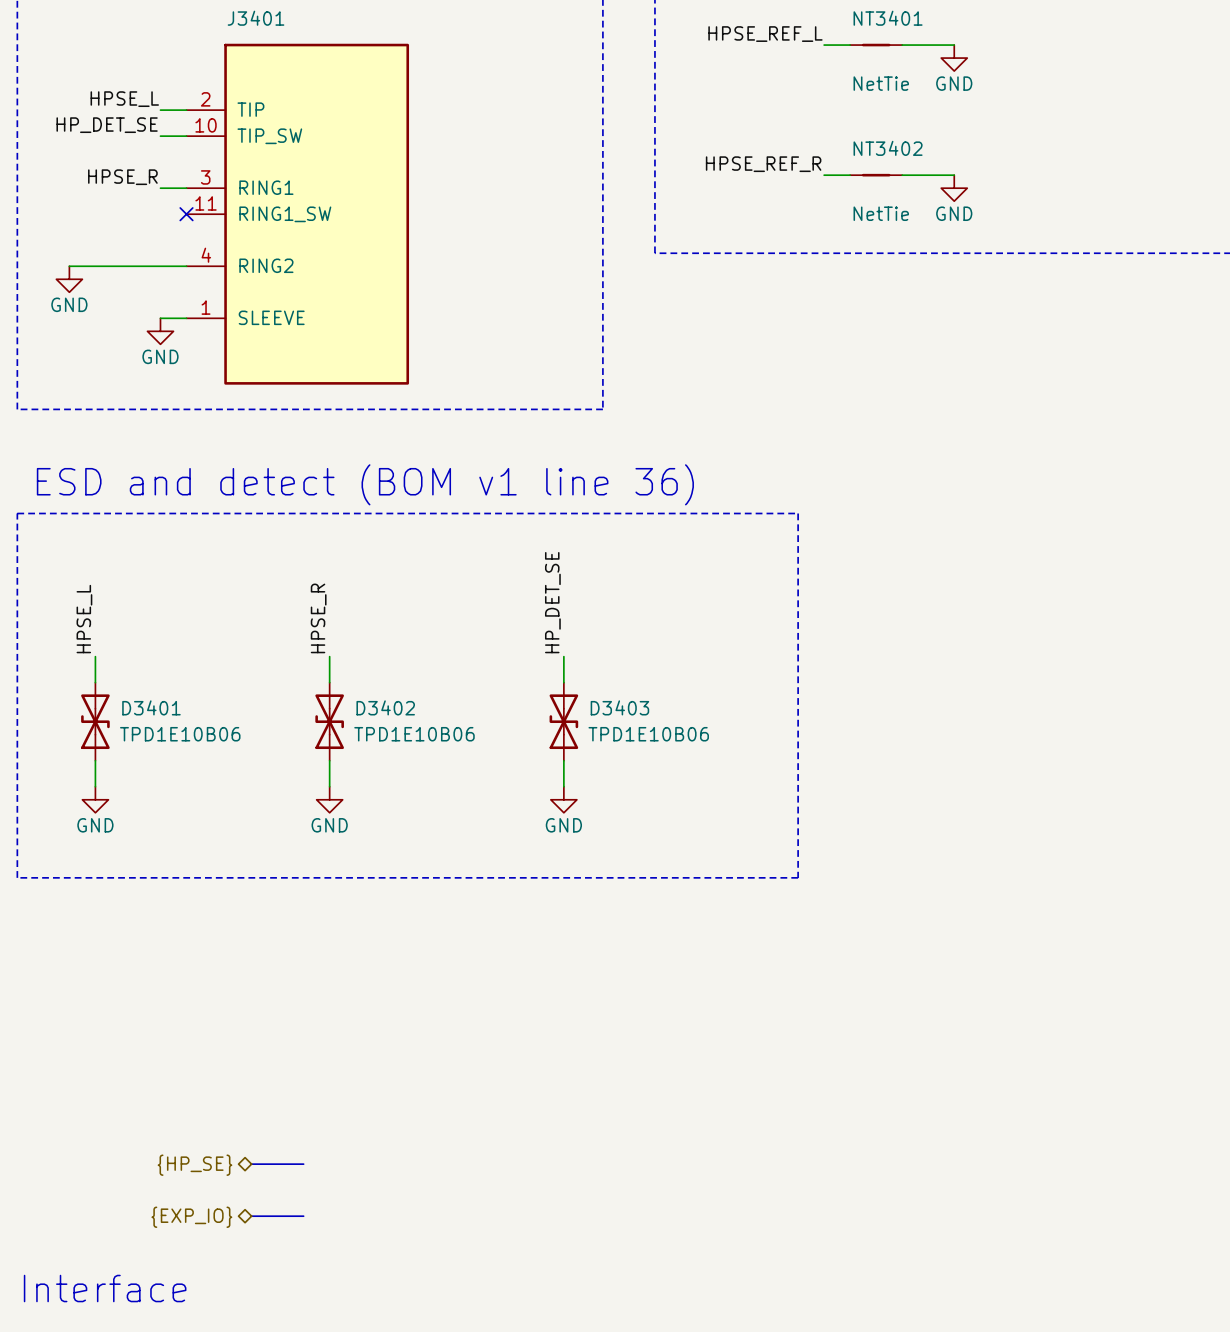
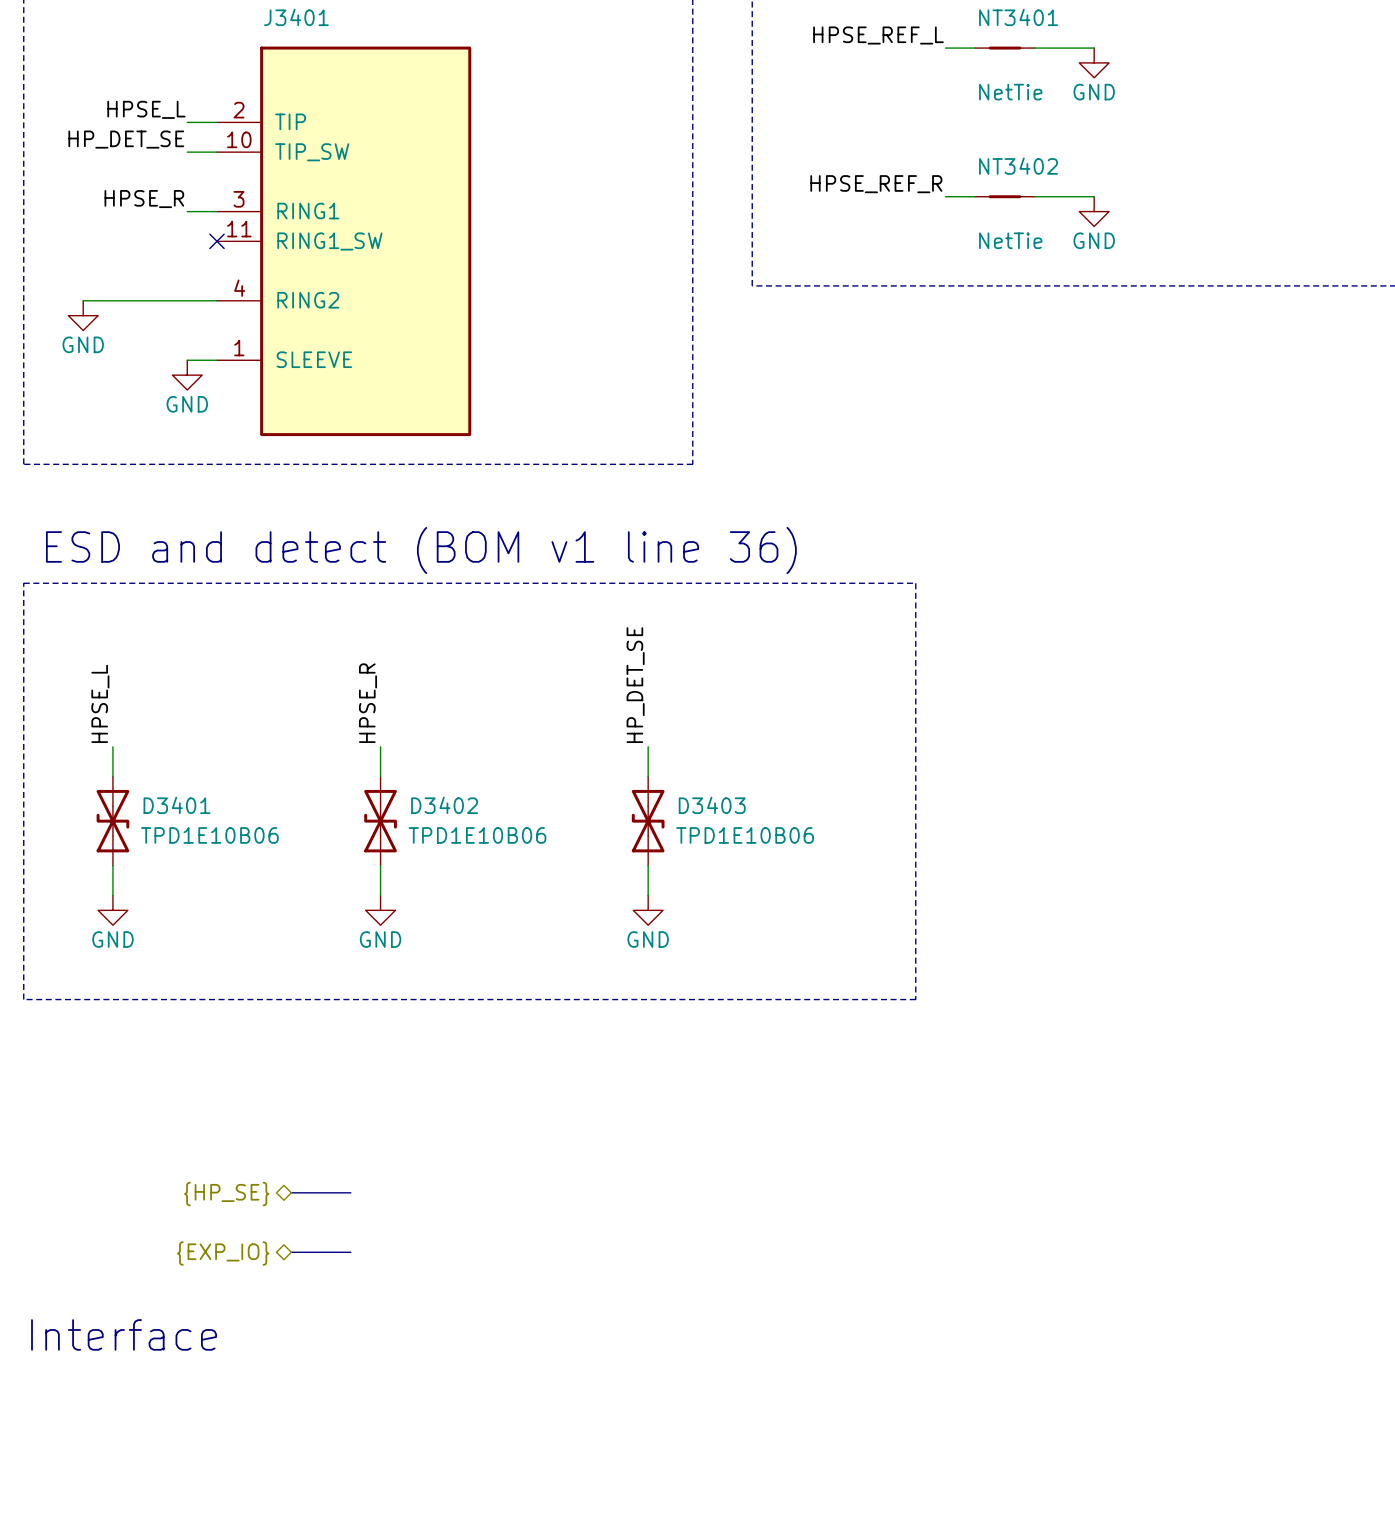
bus: (251, 1164) (303, 1164) -> (291, 1192) (350, 1192)
hierarchical label position: {HP_SE} (194, 1165) -> {HP_SE} (226, 1194)
bus: (251, 1216) (303, 1216) -> (291, 1252) (350, 1252)
hierarchical label position: {EXP_IO} (191, 1217) -> {EXP_IO} (223, 1253)
text position: Interface (105, 1288) -> Interface (124, 1334)

